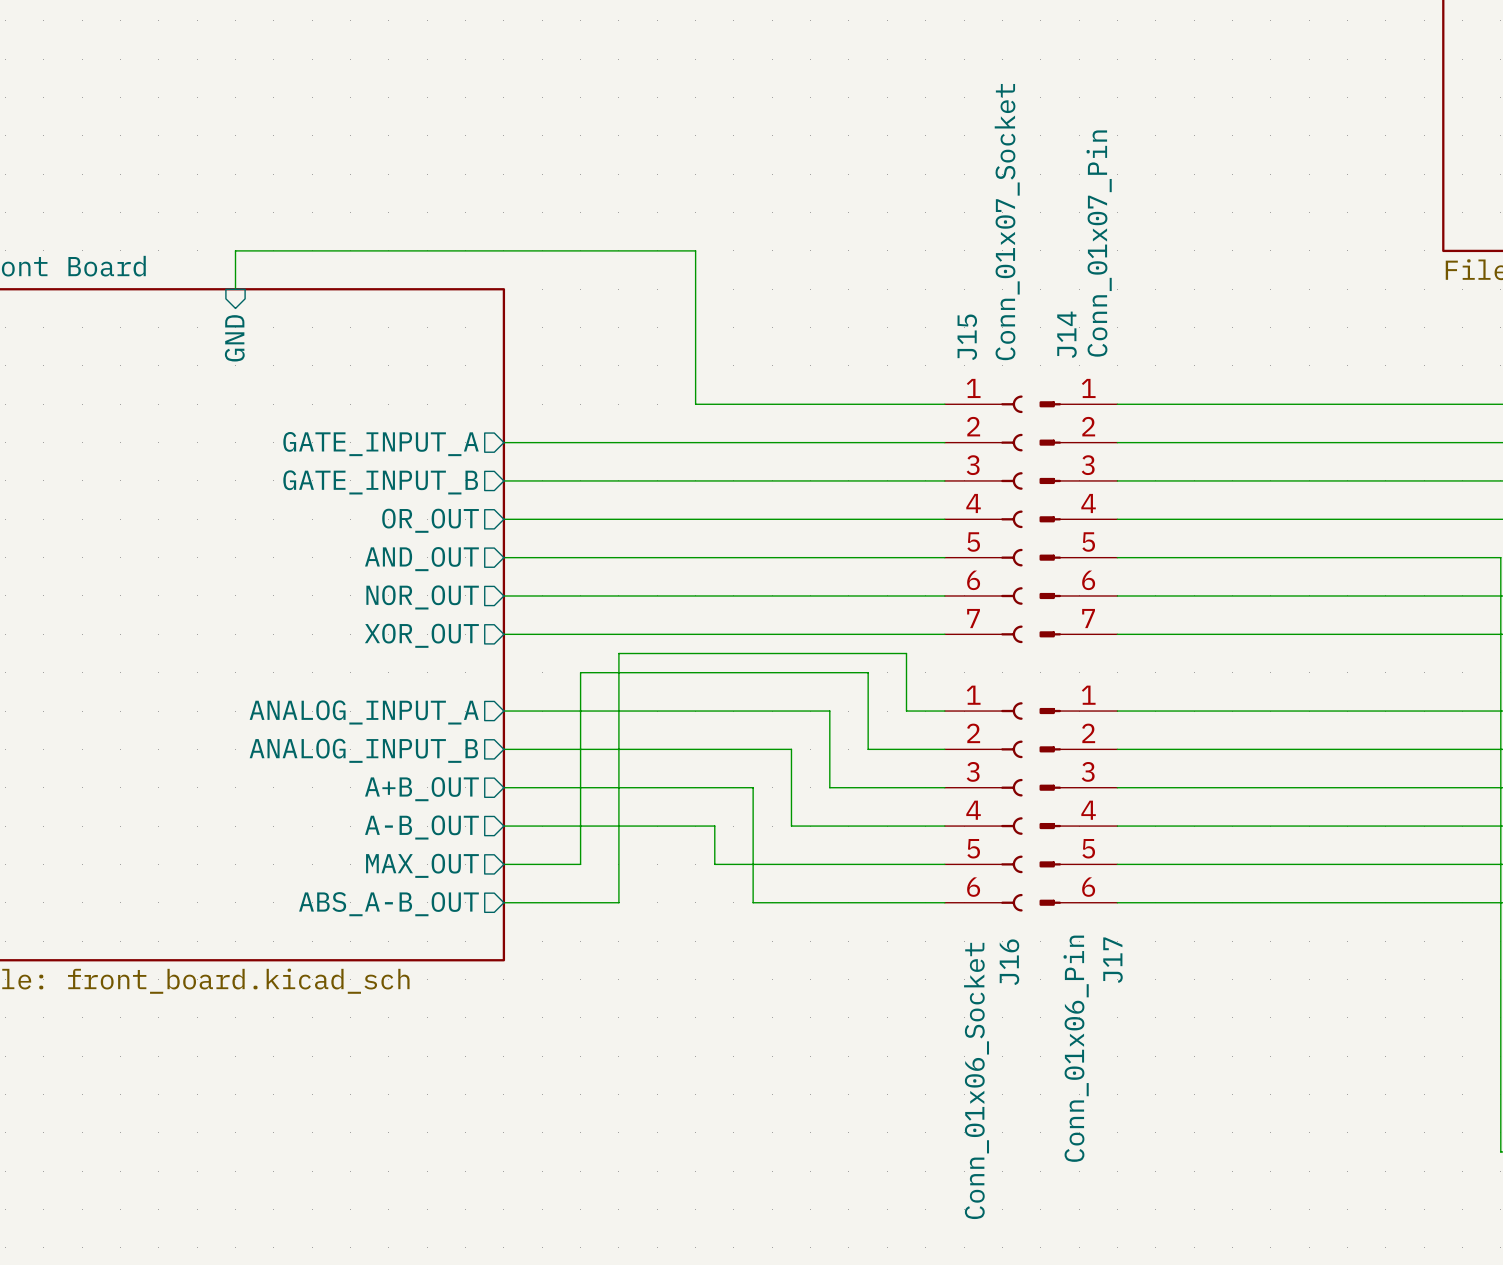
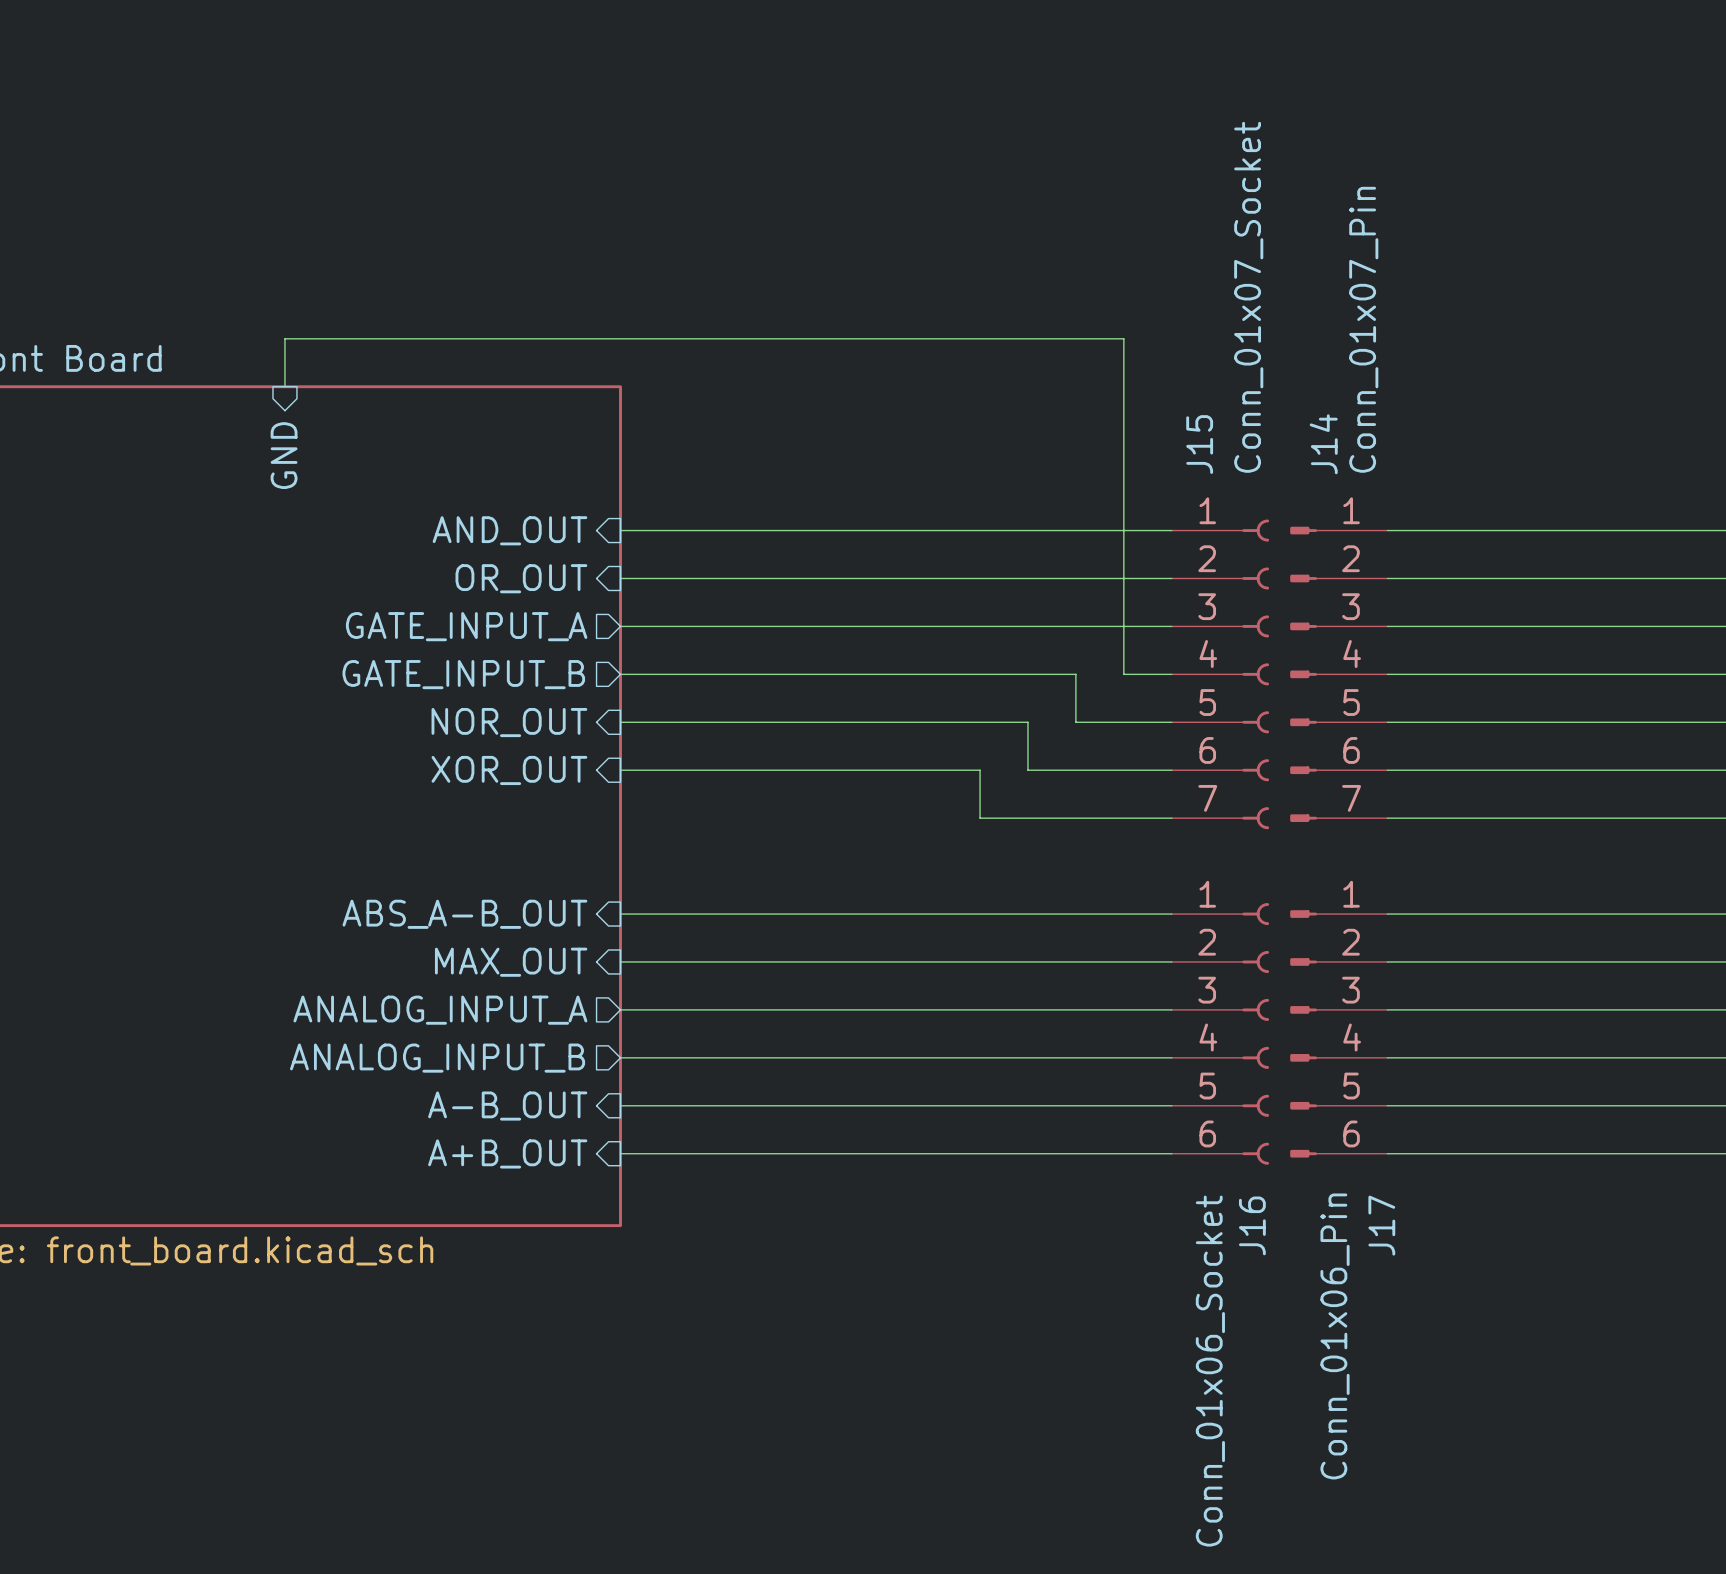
wire: (695, 250) (695, 404) -> (860, 338) (1123, 338) (1123, 674)
wire: none -> (620, 530) (860, 530)
sheet pin: none -> AND_OUT (510, 530)
sheet pin shape: output (381, 444) -> input (521, 578)
sheet pin: GATE_INPUT_A (381, 444) -> OR_OUT (521, 578)
sheet pin: GATE_INPUT_B (380, 482) -> GATE_INPUT_A (466, 626)
wire: (868, 519) (906, 519) -> (1075, 674) (1075, 722)
sheet pin: OR_OUT (430, 520) -> GATE_INPUT_B (463, 674)
wire: (829, 557) (868, 557) -> (1027, 722) (1027, 770)
sheet pin shape: output (421, 559) -> input (509, 722)
sheet pin: AND_OUT (421, 559) -> NOR_OUT (509, 722)
wire: (791, 595) (829, 595) -> (980, 770) (980, 818)
sheet pin shape: output (422, 597) -> input (509, 770)
sheet pin: NOR_OUT (422, 597) -> XOR_OUT (509, 770)
wire: (503, 634) (791, 634) -> none
sheet pin: XOR_OUT (421, 635) -> none
wire: (829, 711) (829, 787) -> (1027, 914) (1123, 914)
wire: (906, 711) (906, 653) (618, 653) (618, 902) -> (932, 1153) (764, 1153)
sheet pin shape: output (364, 712) -> input (464, 914)
sheet pin: ANALOG_INPUT_A (364, 712) -> ABS_A-B_OUT (464, 914)
wire: (791, 749) (791, 826) -> (980, 961) (1075, 961)
wire: (868, 749) (868, 672) (580, 672) (580, 864) -> (884, 1105) (716, 1105)
sheet pin shape: output (363, 750) -> input (511, 962)
sheet pin: ANALOG_INPUT_B (363, 750) -> MAX_OUT (511, 962)
wire: (753, 787) (753, 902) -> (932, 1009) (1027, 1009)
sheet pin: A+B_OUT (421, 789) -> ANALOG_INPUT_A (440, 1010)
wire: (714, 826) (714, 864) -> (884, 1057) (980, 1057)
sheet pin: A-B_OUT (421, 827) -> ANALOG_INPUT_B (437, 1058)
sheet pin shape: output (422, 865) -> input (507, 1106)
sheet pin: MAX_OUT (422, 865) -> A-B_OUT (507, 1106)
sheet pin shape: output (388, 904) -> input (507, 1153)
sheet pin: ABS_A-B_OUT (388, 904) -> A+B_OUT (507, 1153)

